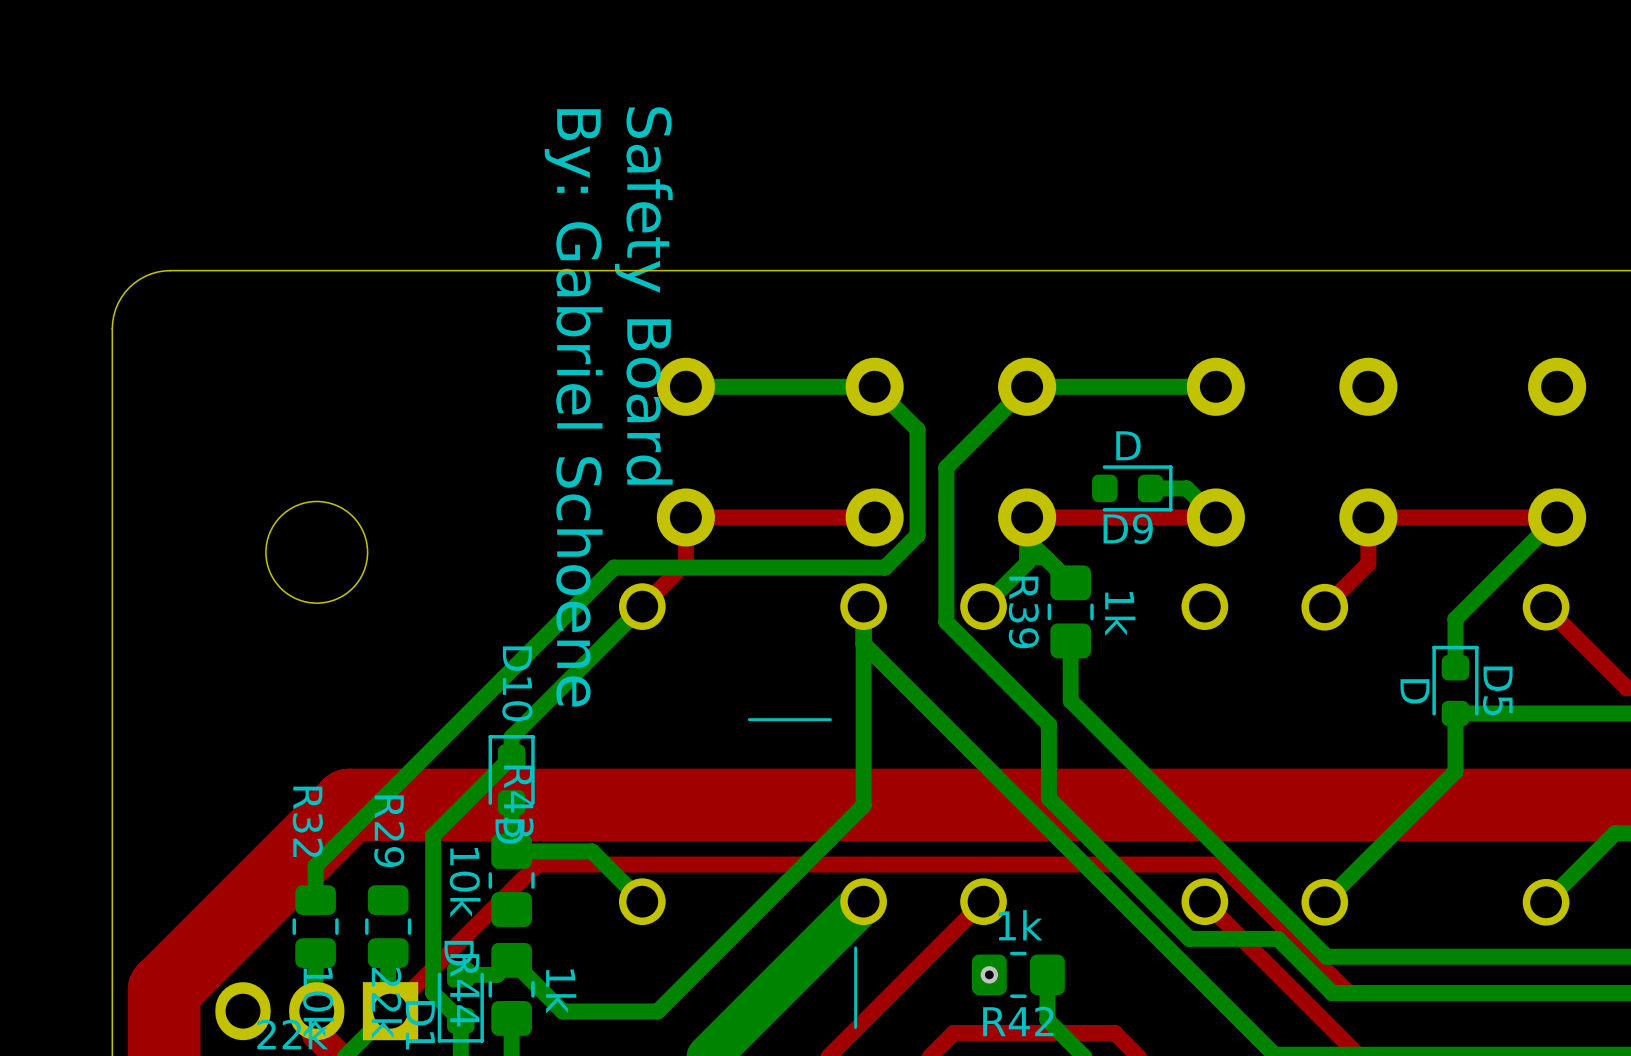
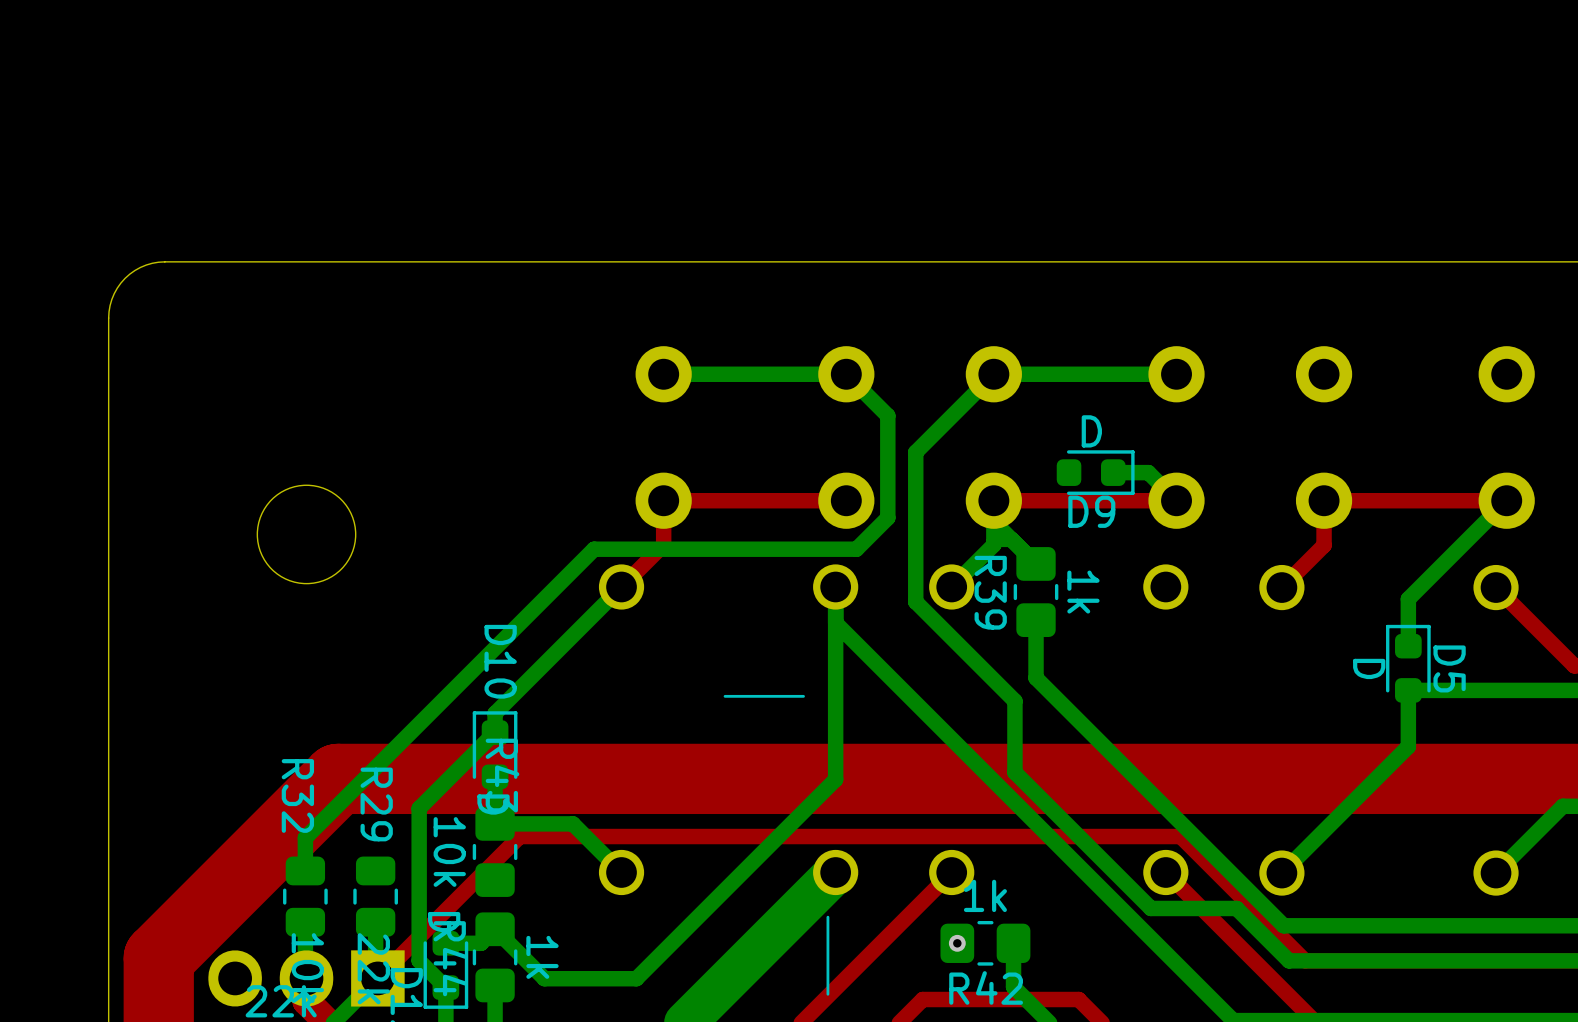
text: Safety Board (643, 295) -> none
text: By: Gabriel Schoene (573, 407) -> none

